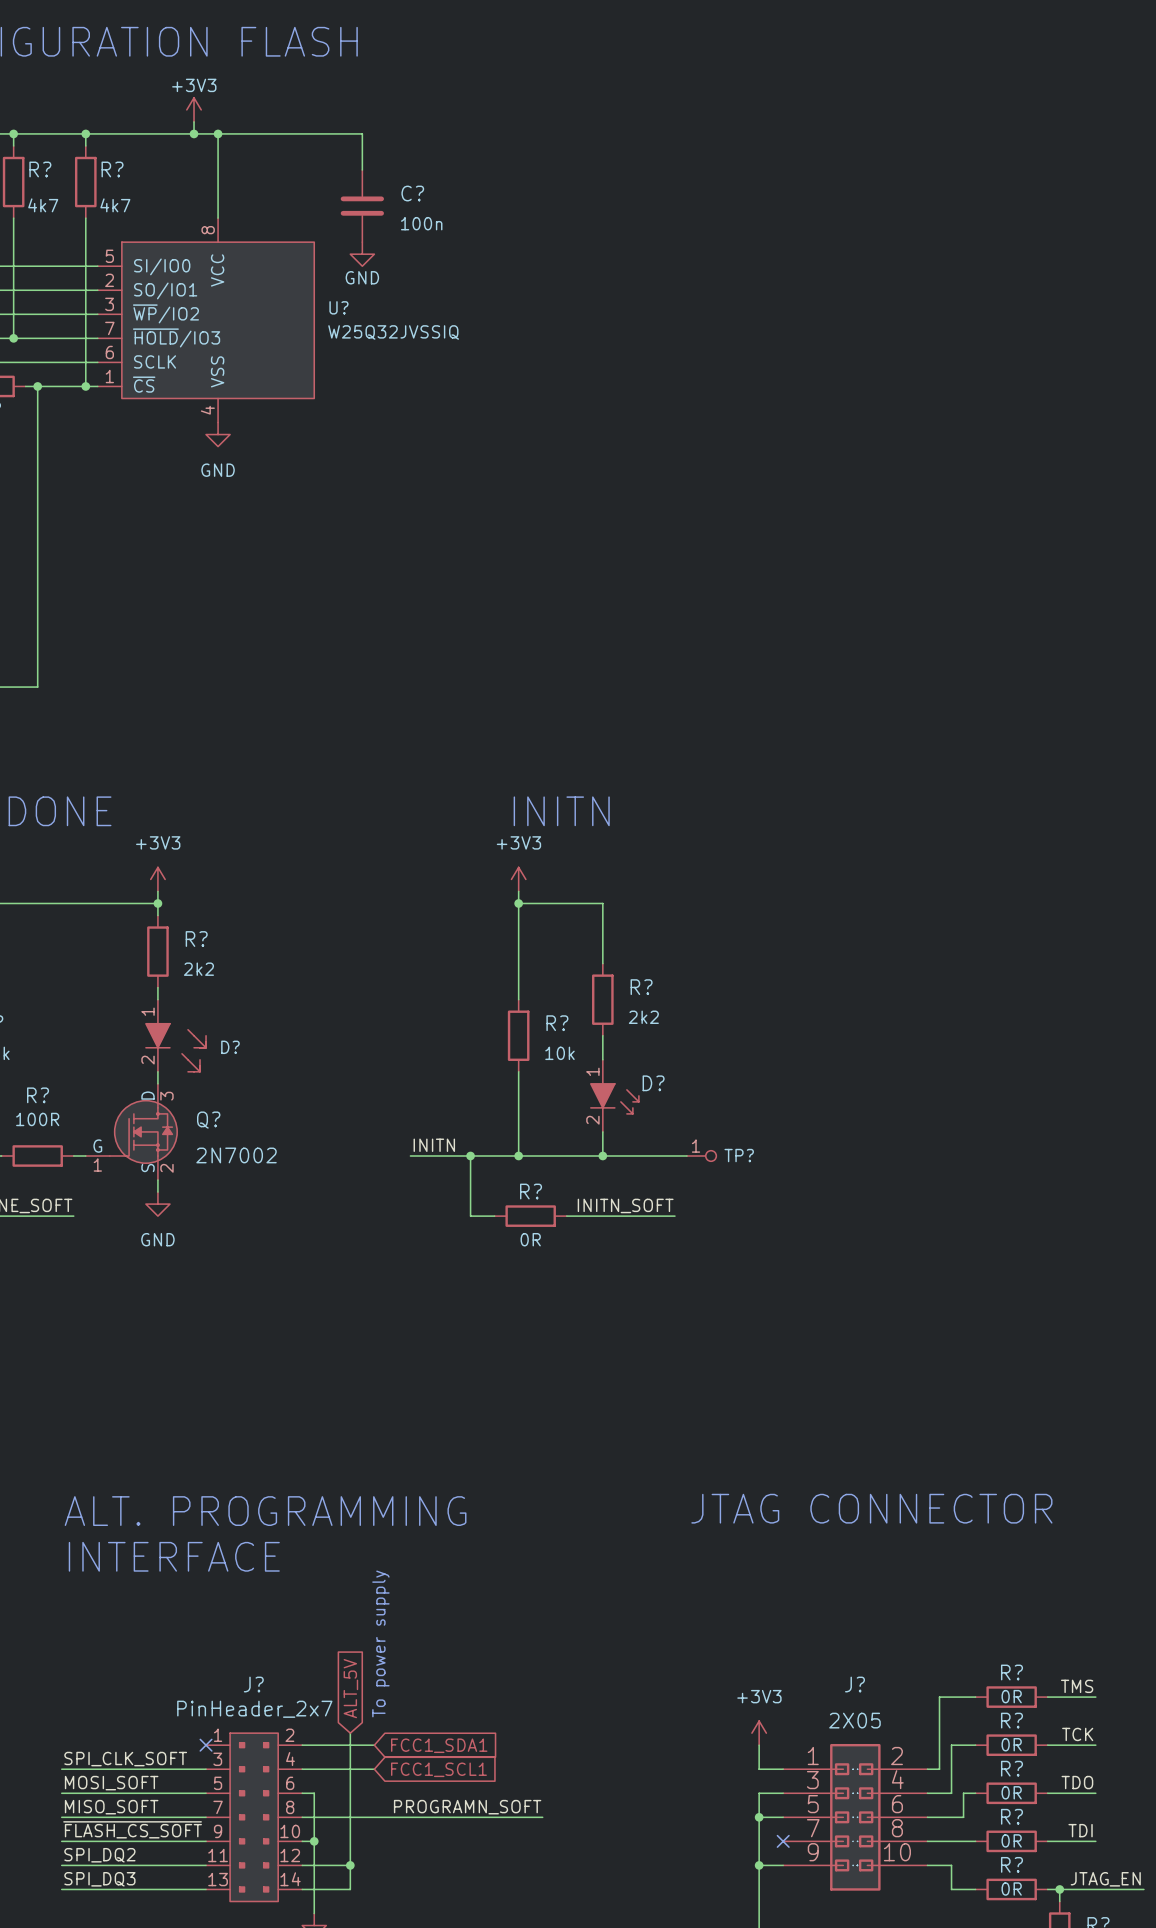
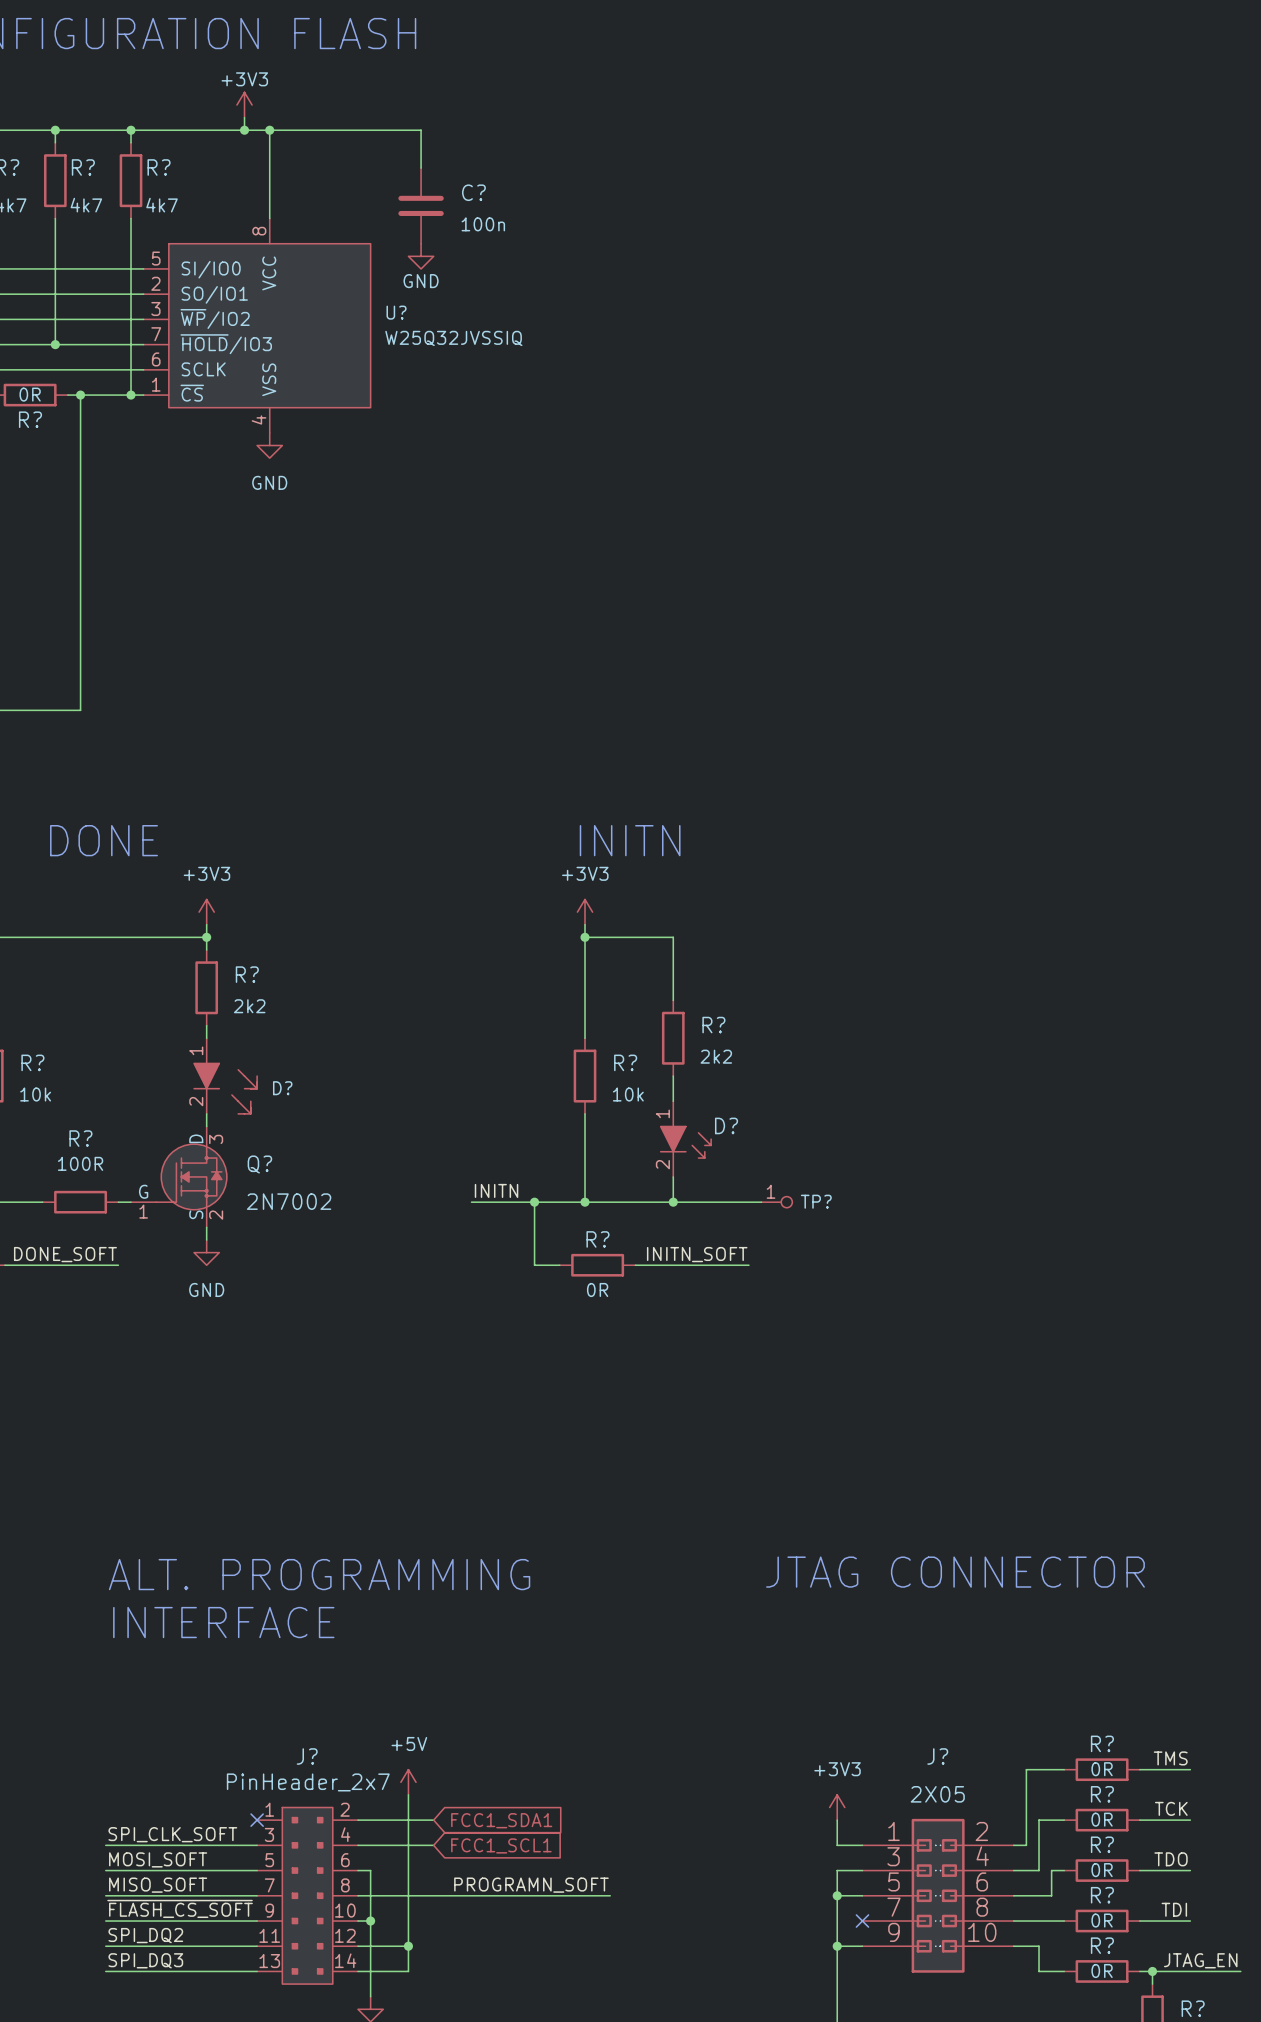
text: To power supply (380, 1643) -> none
global label: ALT_5V (350, 1688) -> none
power symbol: none -> +5V (408, 1782)
wire: none -> (408, 1794) (408, 1807)

